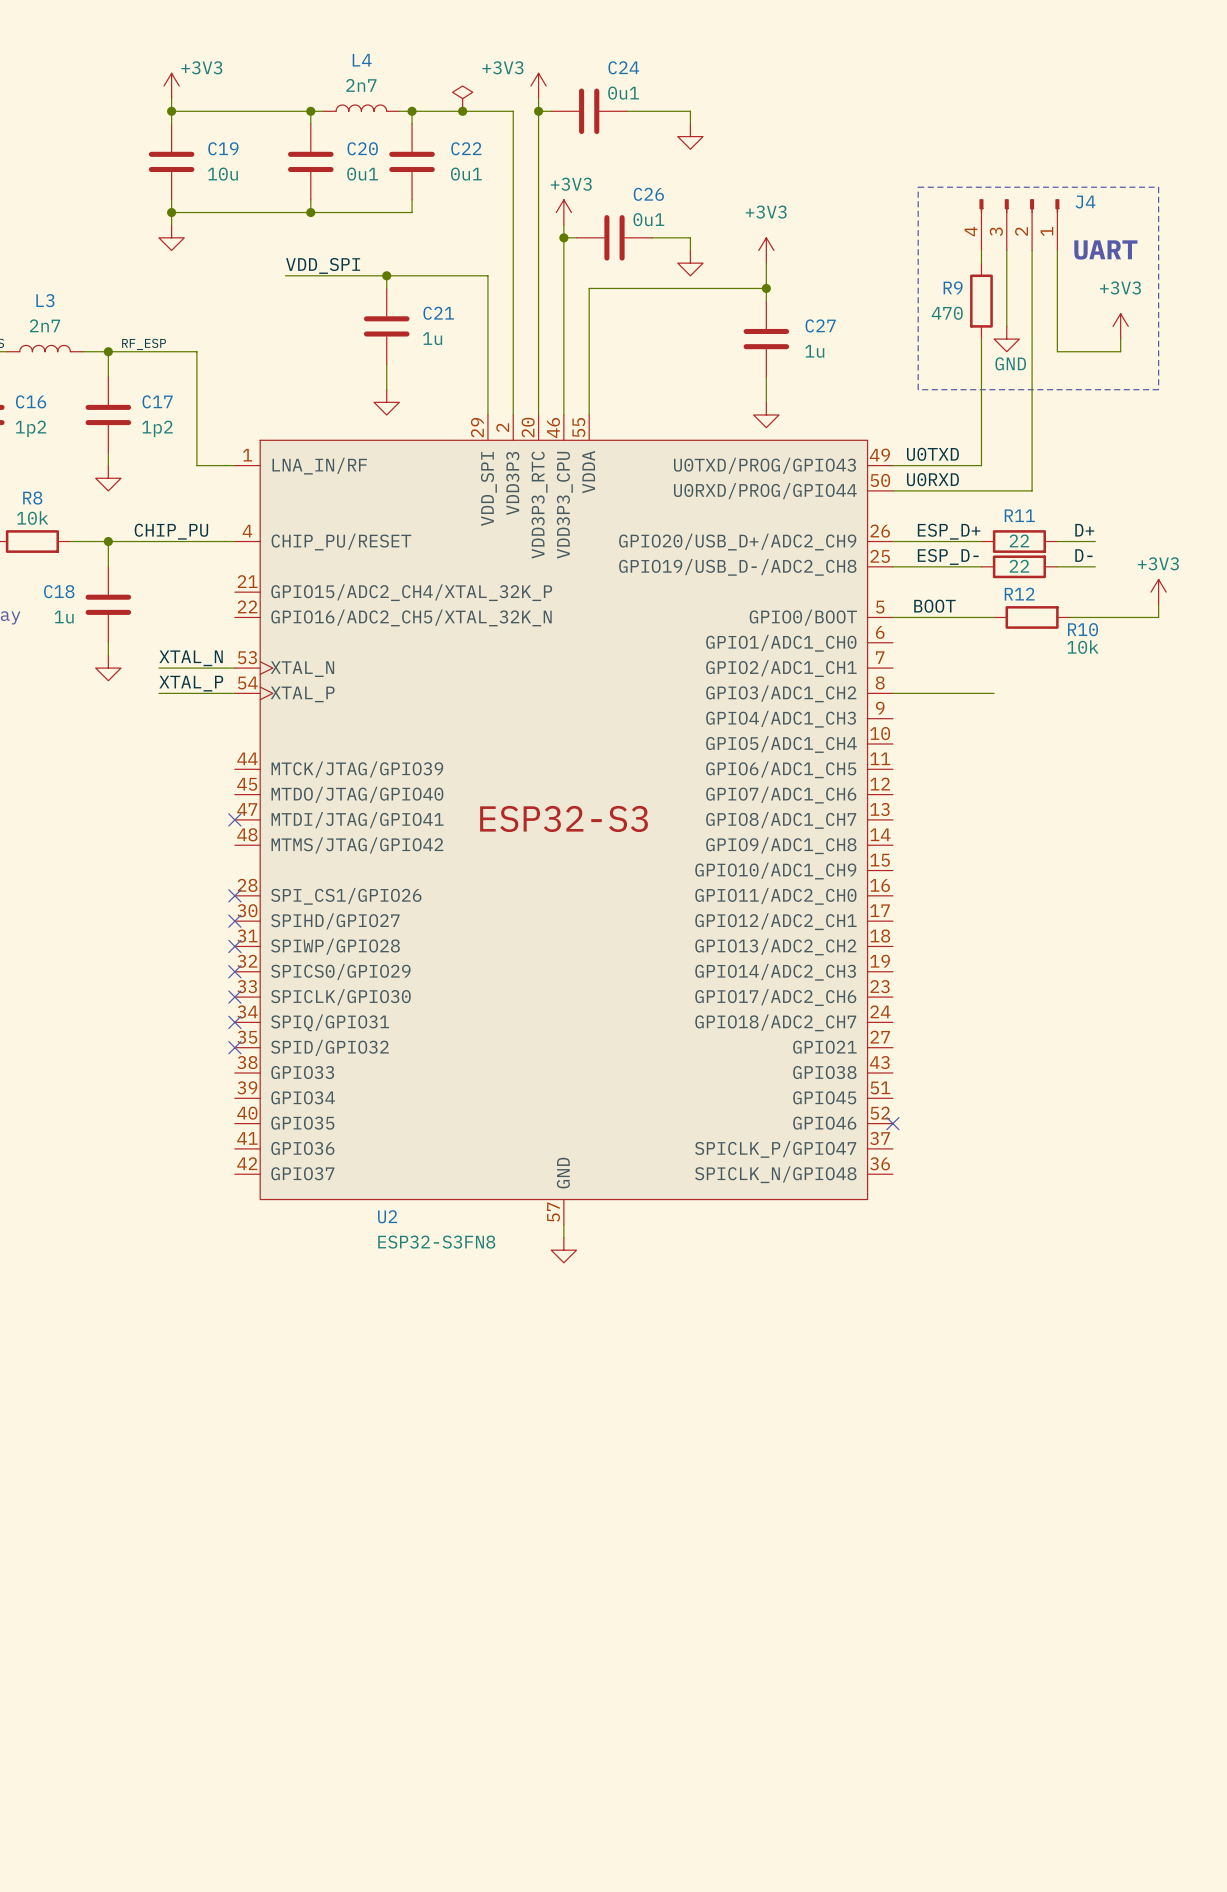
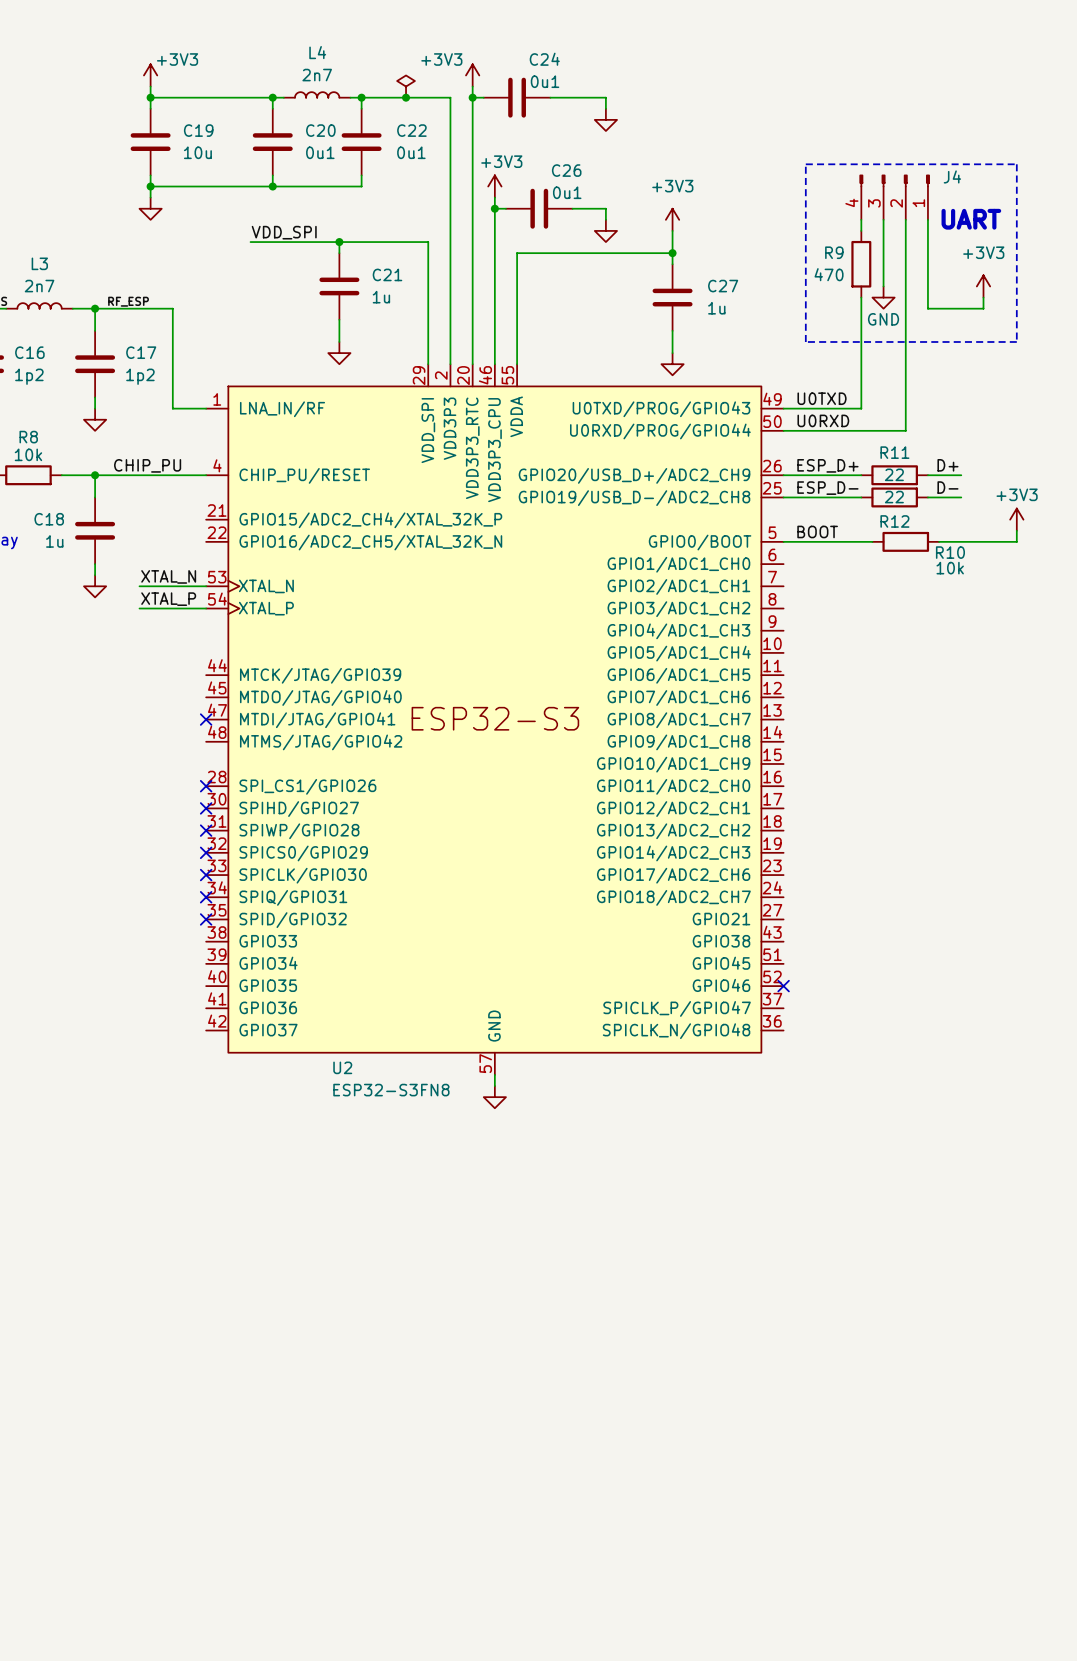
wire: (892, 693) (994, 693) -> none

